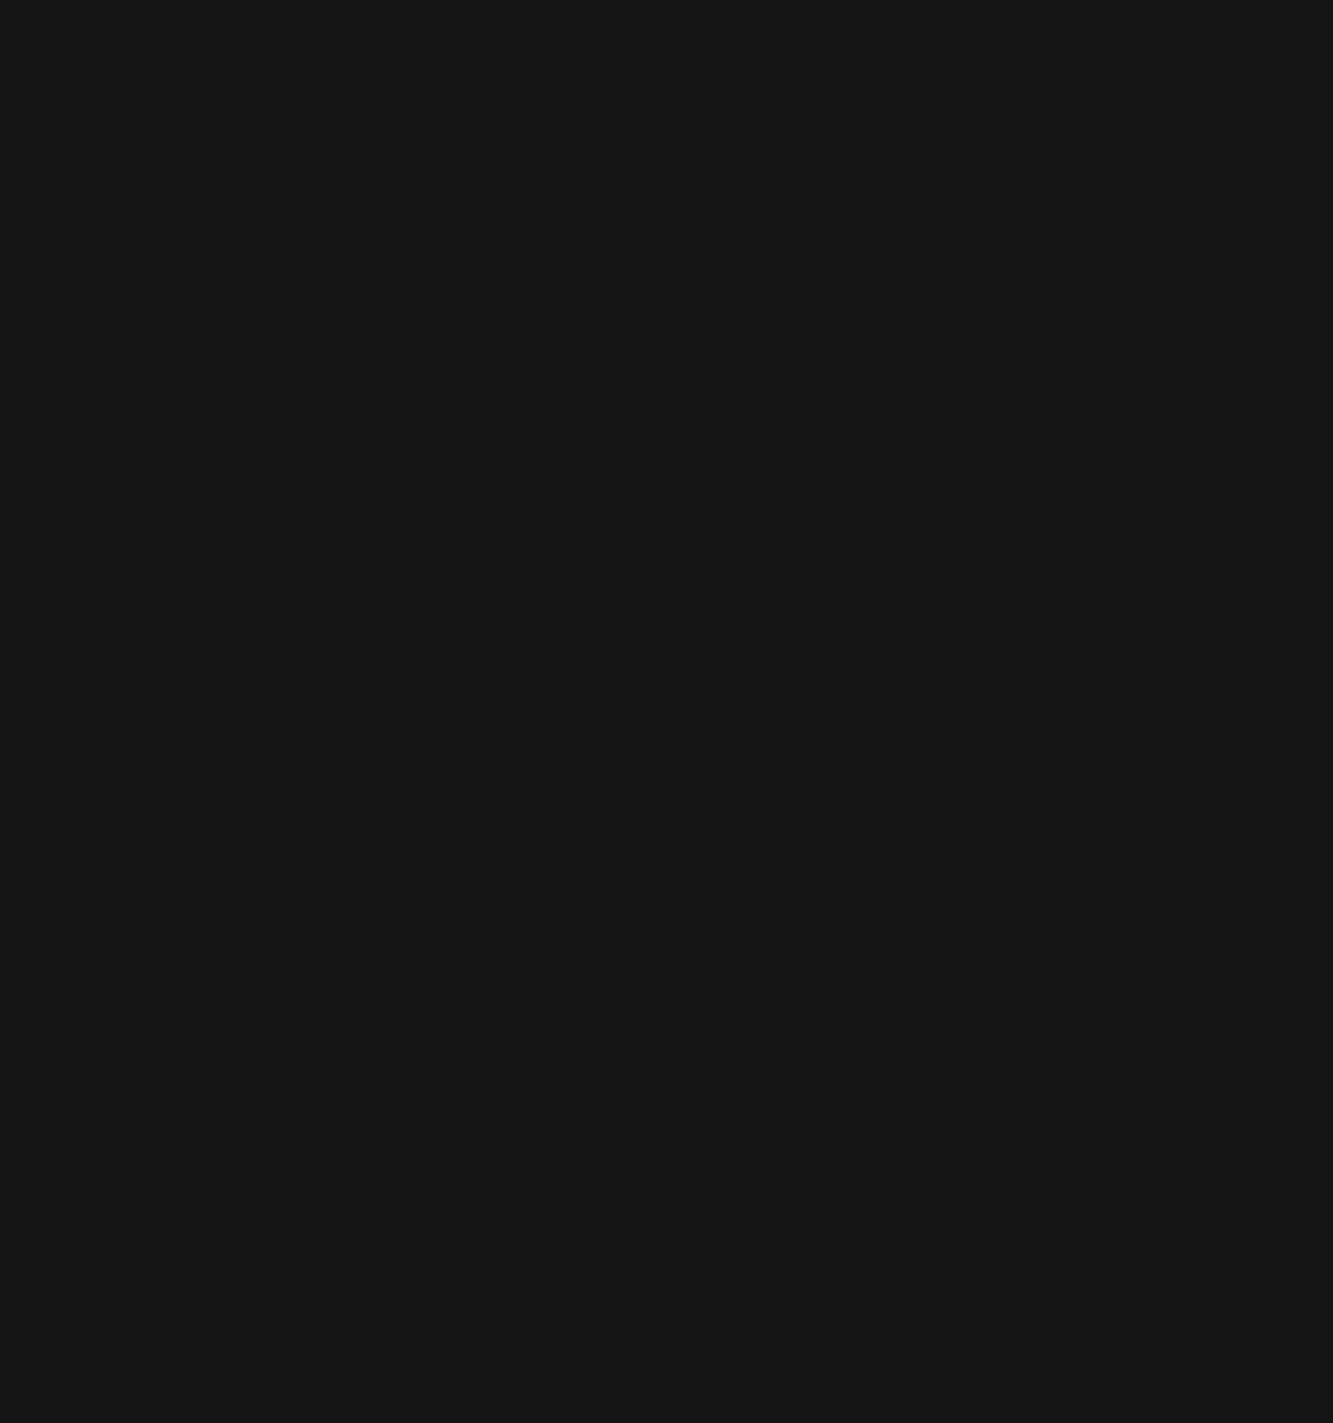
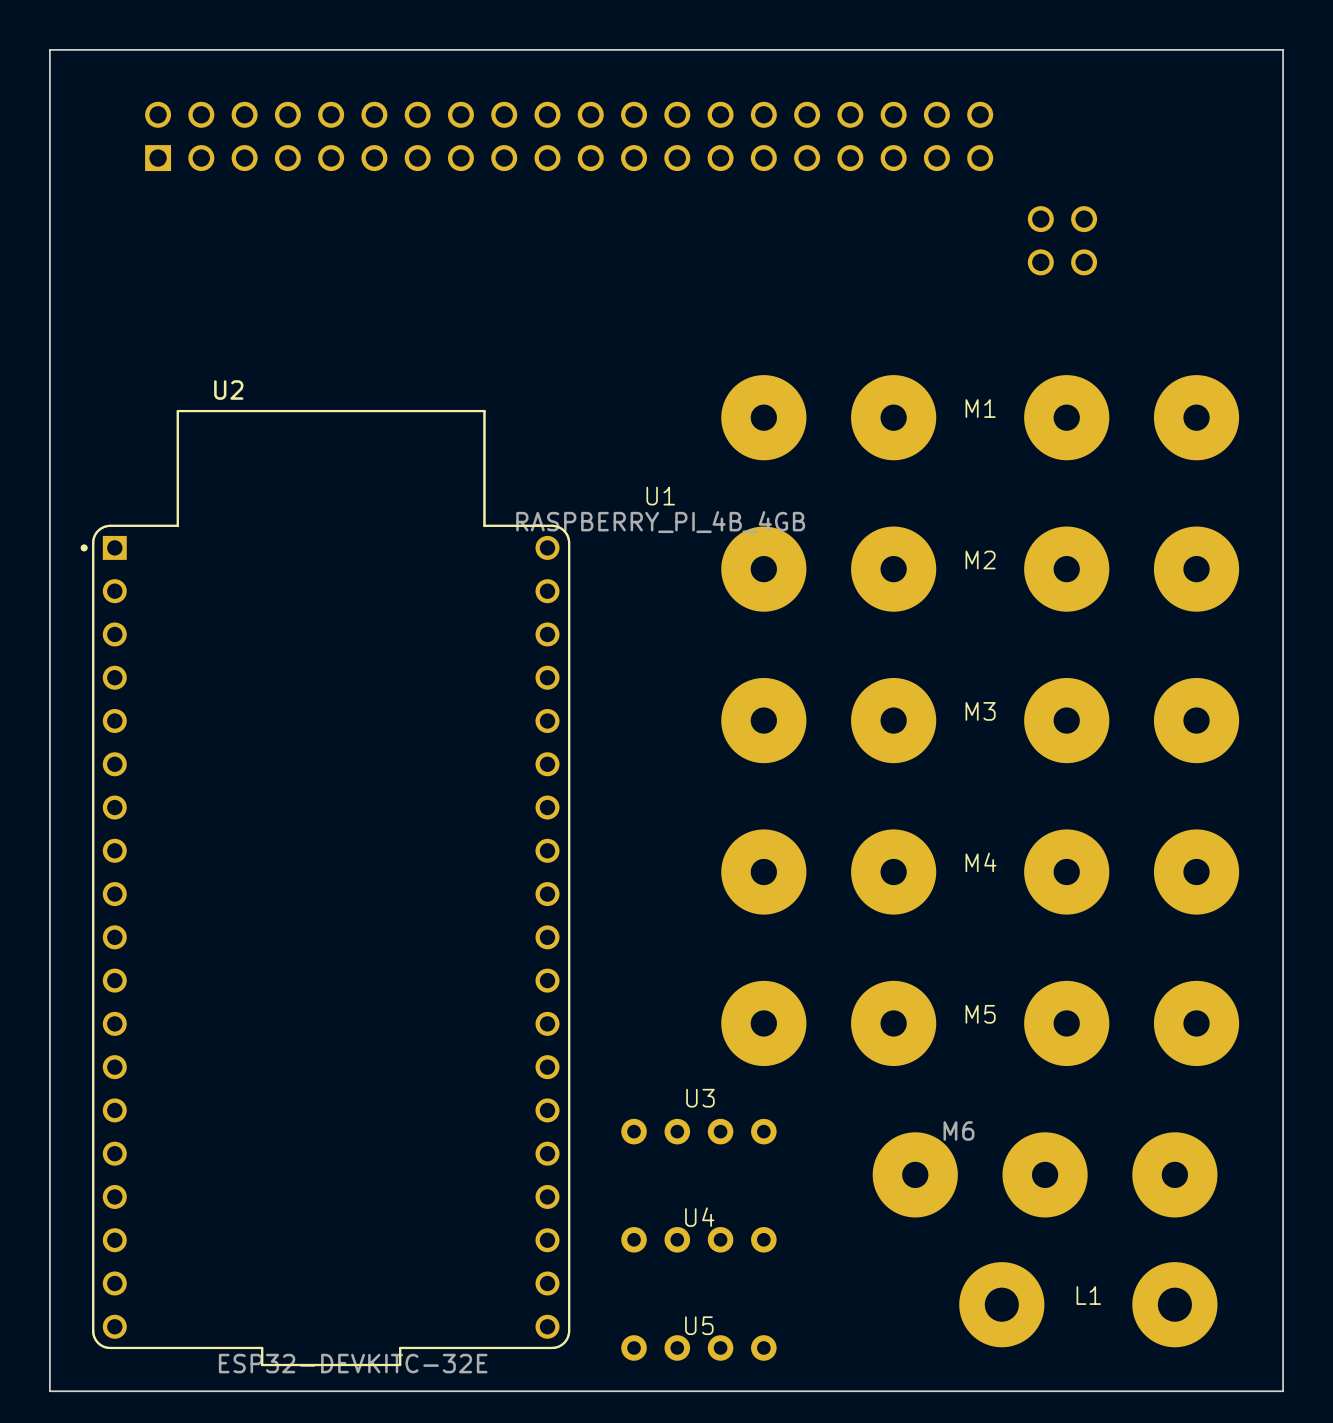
board edge: none -> (49, 49) (49, 1391) (1283, 1391) (1283, 49) (49, 49)
U1: none -> RASPBERRY_PI_4B_4GB (621, 188)
M1: none -> (980, 417)
M2: none -> (980, 569)
M3: none -> (980, 720)
M4: none -> (980, 872)
U2: none -> ESP32-DEVKITC-32E (325, 888)
M5: none -> (980, 1023)
U3: none -> (698, 1131)
M6: none -> (1045, 1174)
U4: none -> (698, 1239)
L1: none -> (1088, 1304)
U5: none -> (698, 1347)

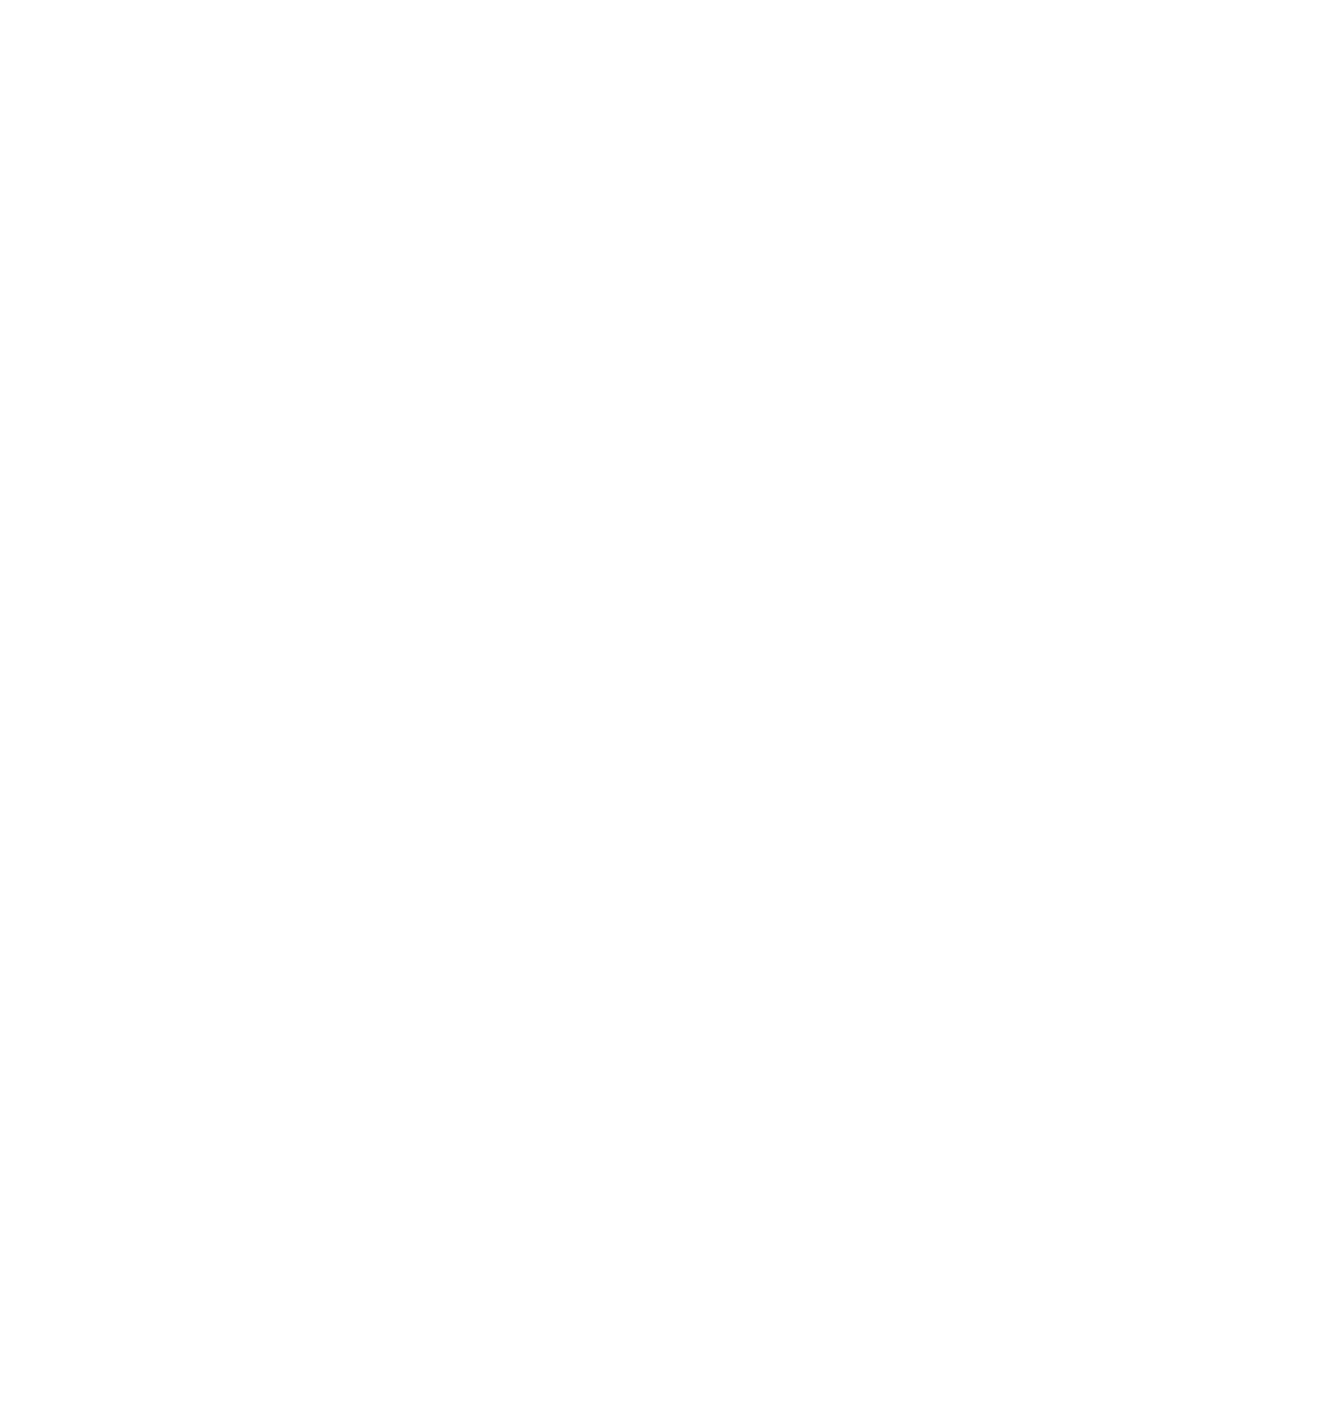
board edge: (49, 49) (49, 1391) (1283, 1391) (1283, 49) (49, 49) -> none
U1: RASPBERRY_PI_4B_4GB (621, 188) -> none
M1: (980, 417) -> none
M2: (980, 569) -> none
M3: (980, 720) -> none
M4: (980, 872) -> none
U2: ESP32-DEVKITC-32E (325, 888) -> none
M5: (980, 1023) -> none
U3: (698, 1131) -> none
M6: (1045, 1174) -> none
U4: (698, 1239) -> none
L1: (1088, 1304) -> none
U5: (698, 1347) -> none

